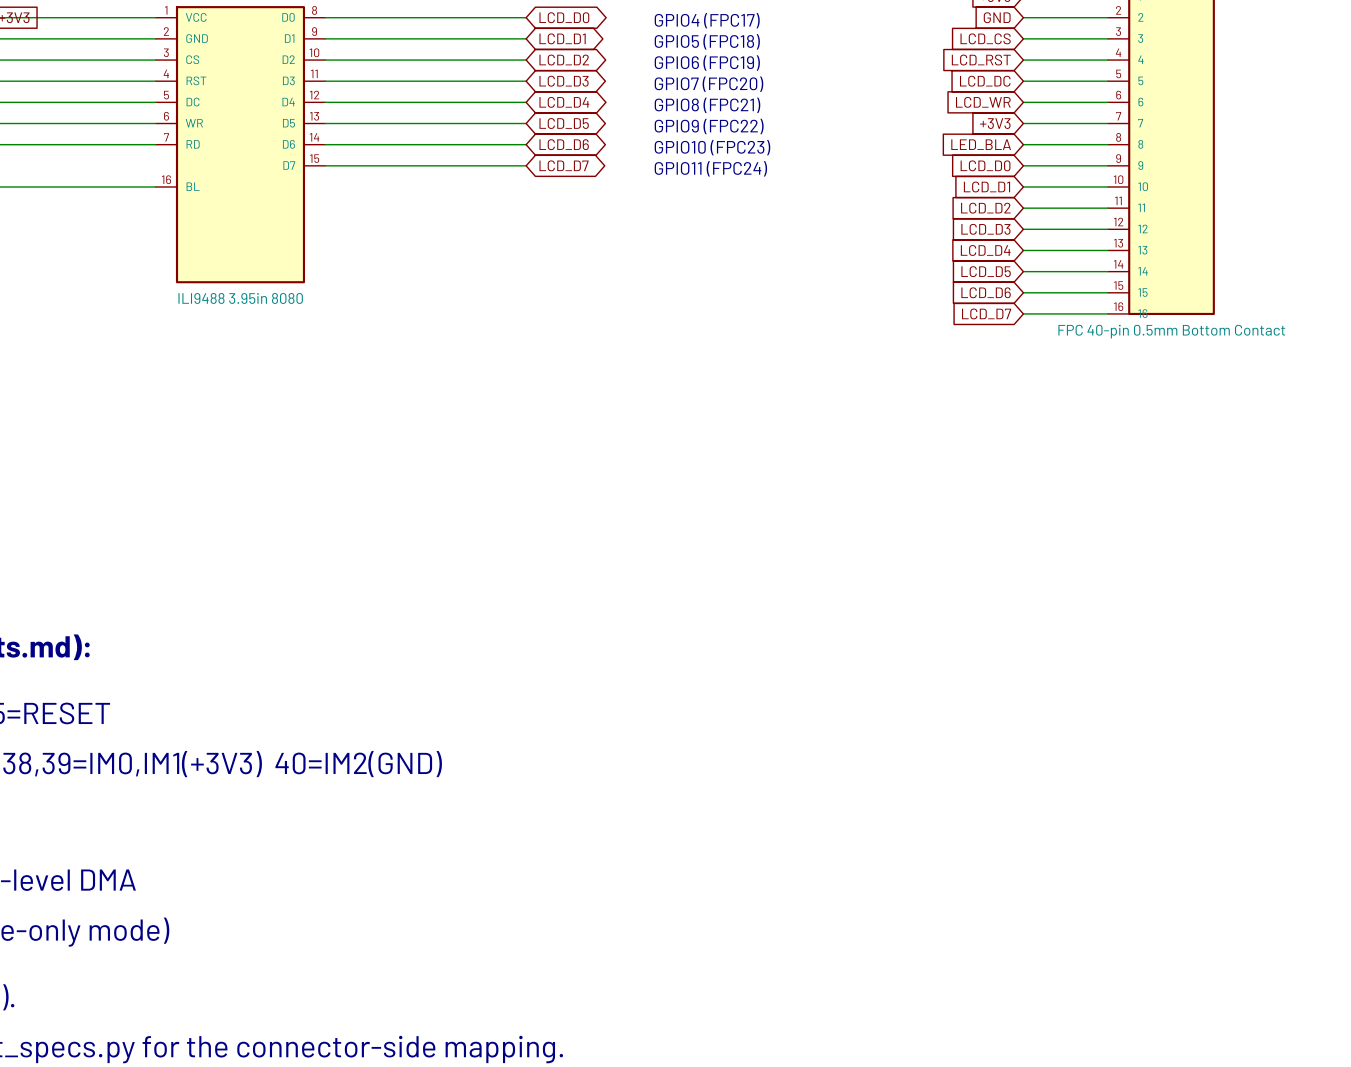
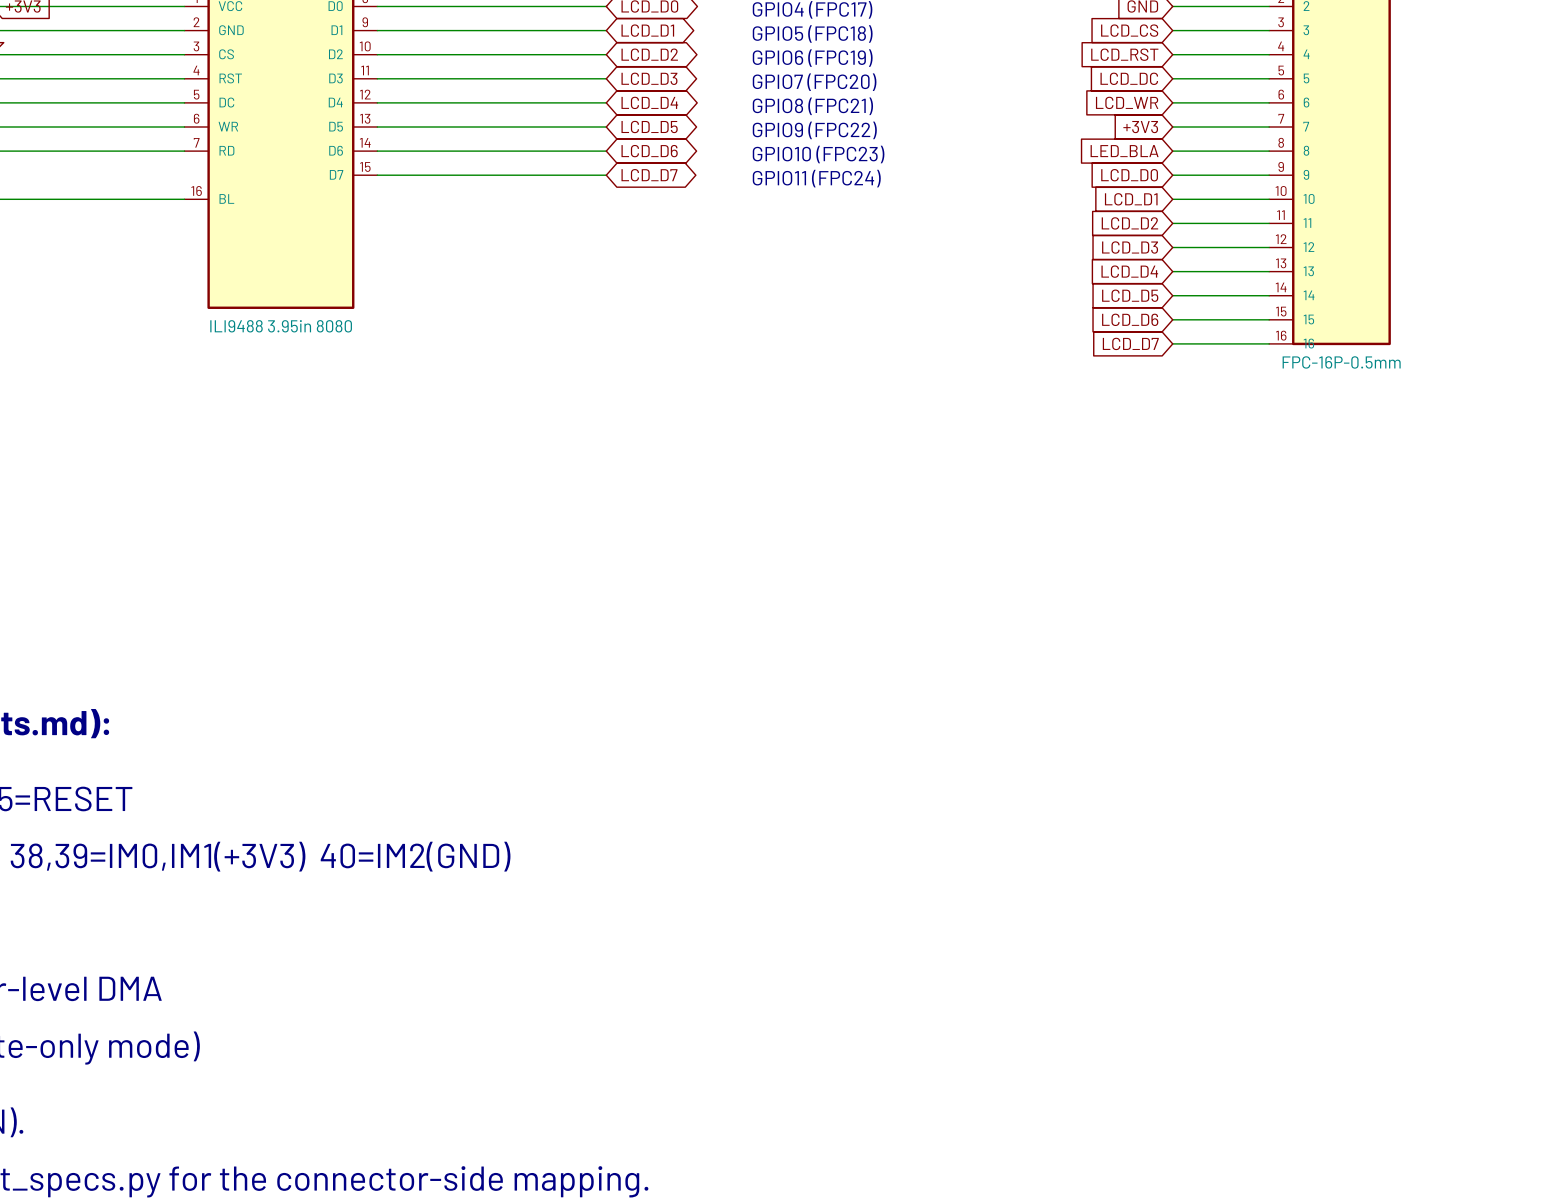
part value: FPC 40-pin 0.5mm Bottom Contact (1171, 331) -> FPC-16P-0.5mm (1341, 362)

